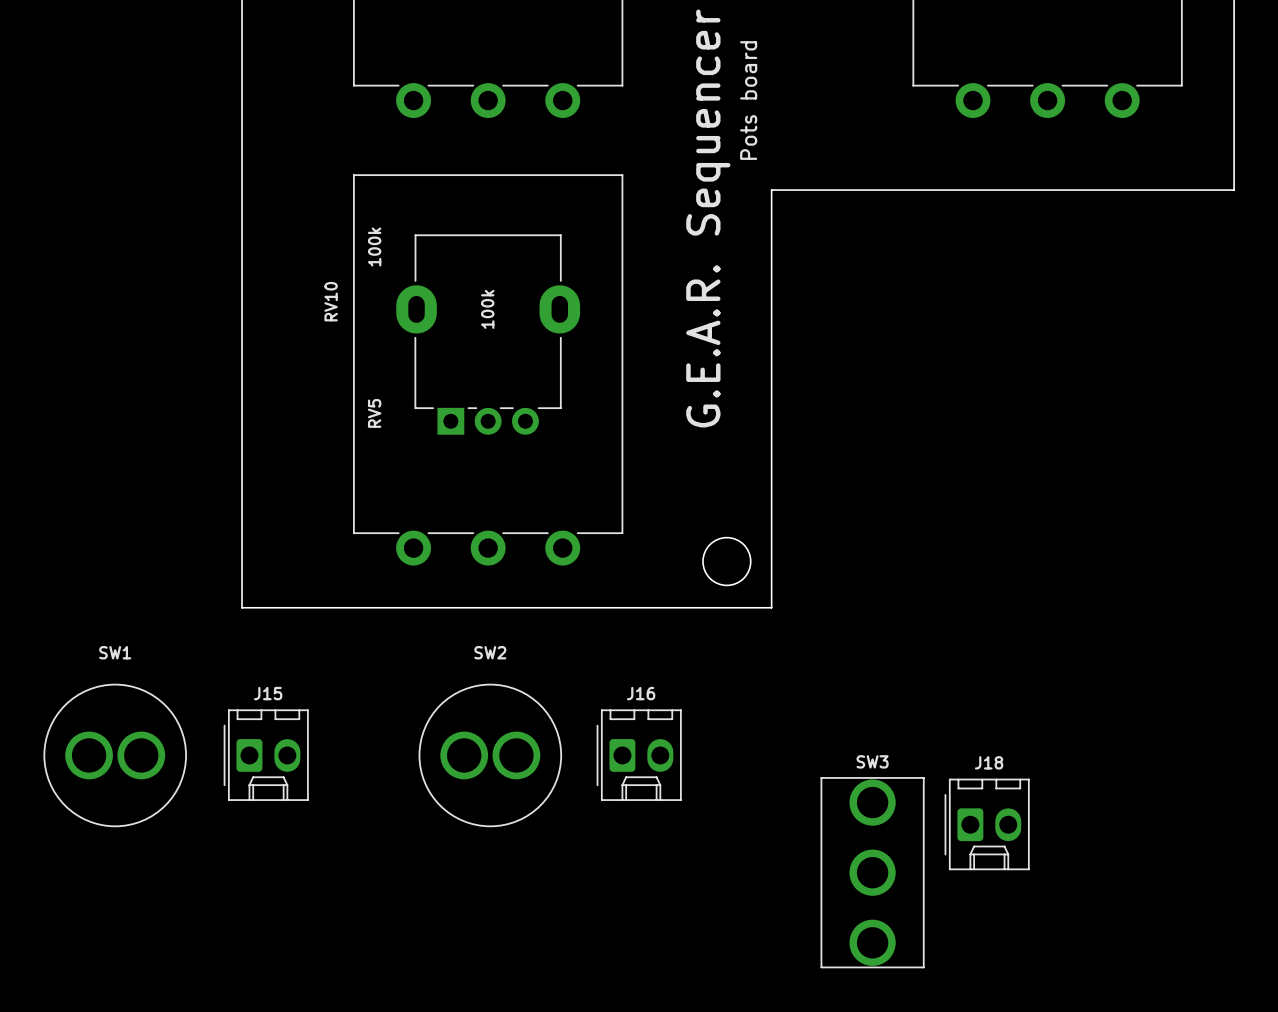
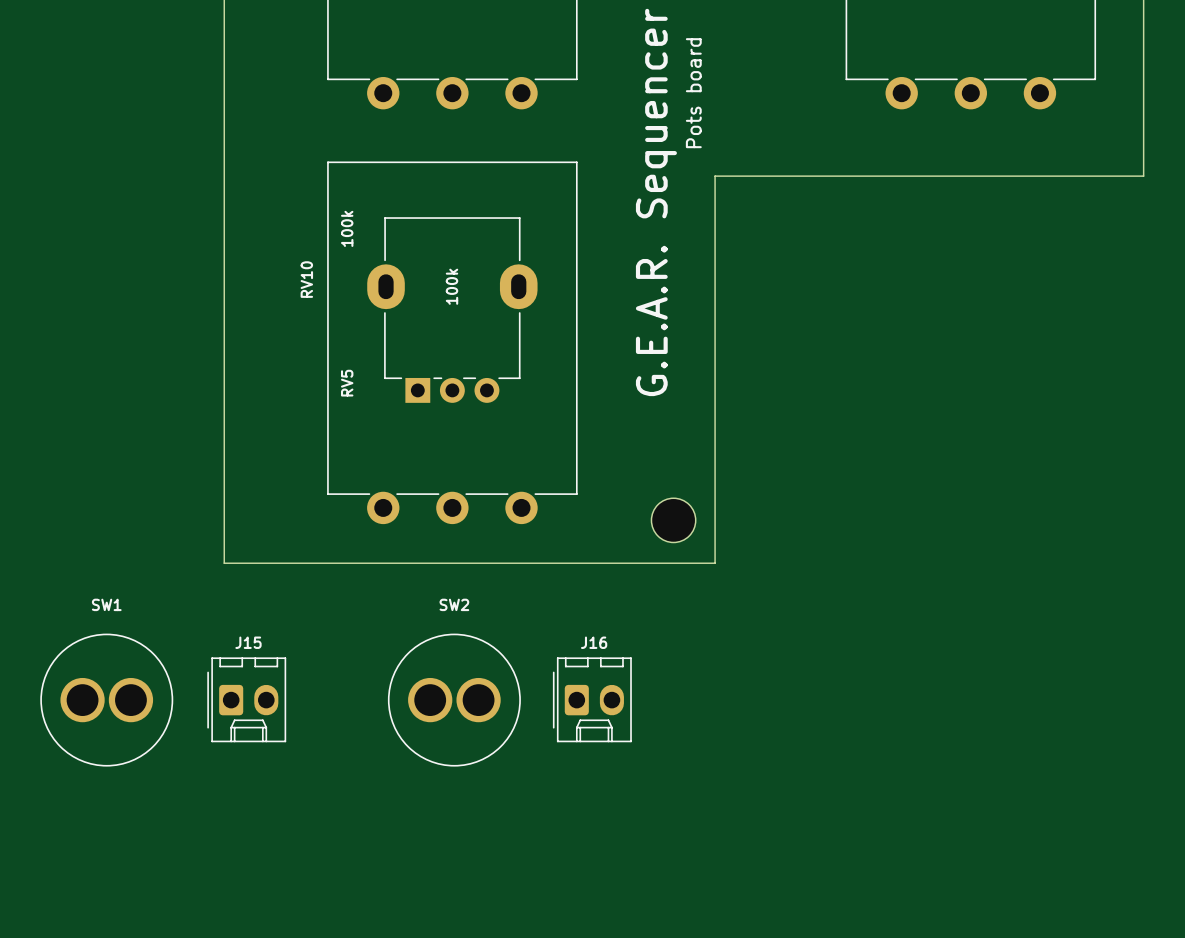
J18: (987, 824) -> none
SW3: (872, 872) -> none

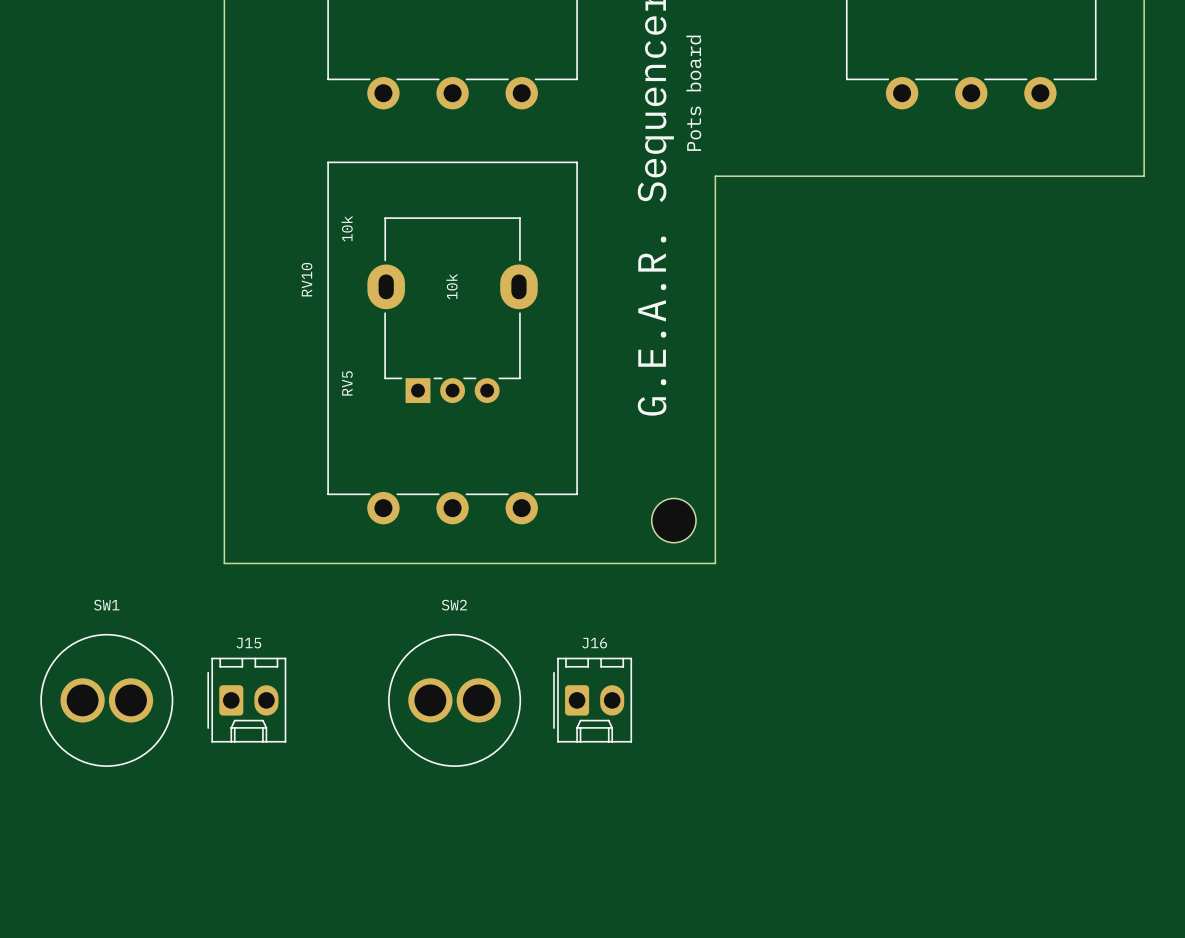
RV5 value: 100k (347, 228) -> 10k (347, 228)
RV10 value: 100k (452, 286) -> 10k (451, 286)

